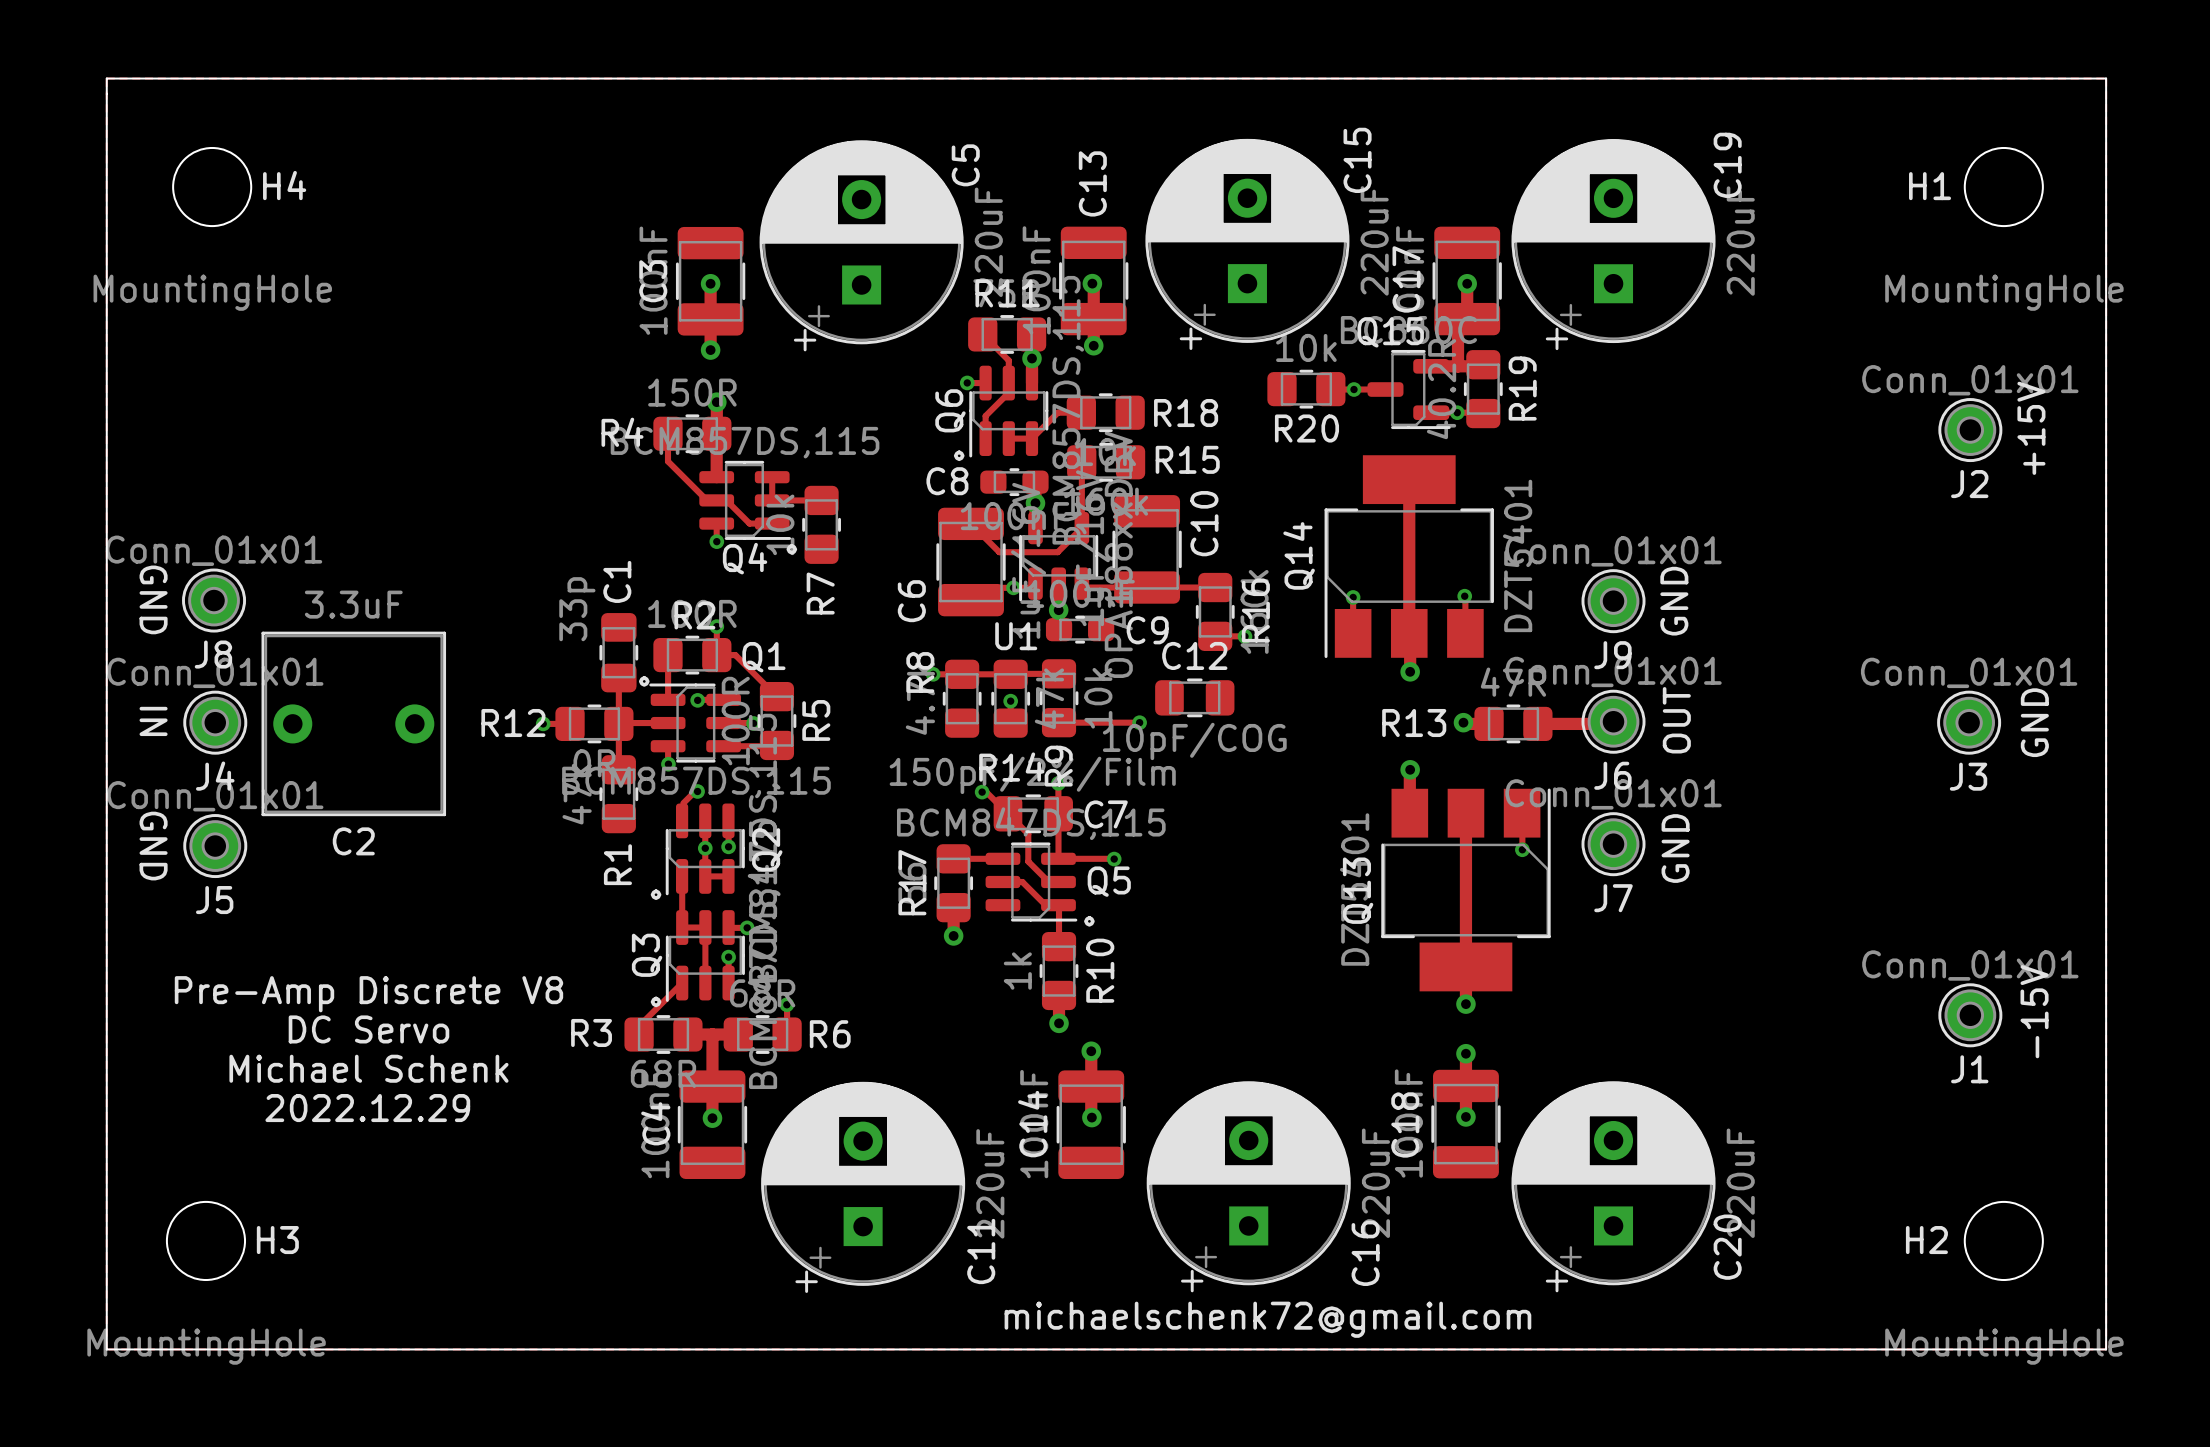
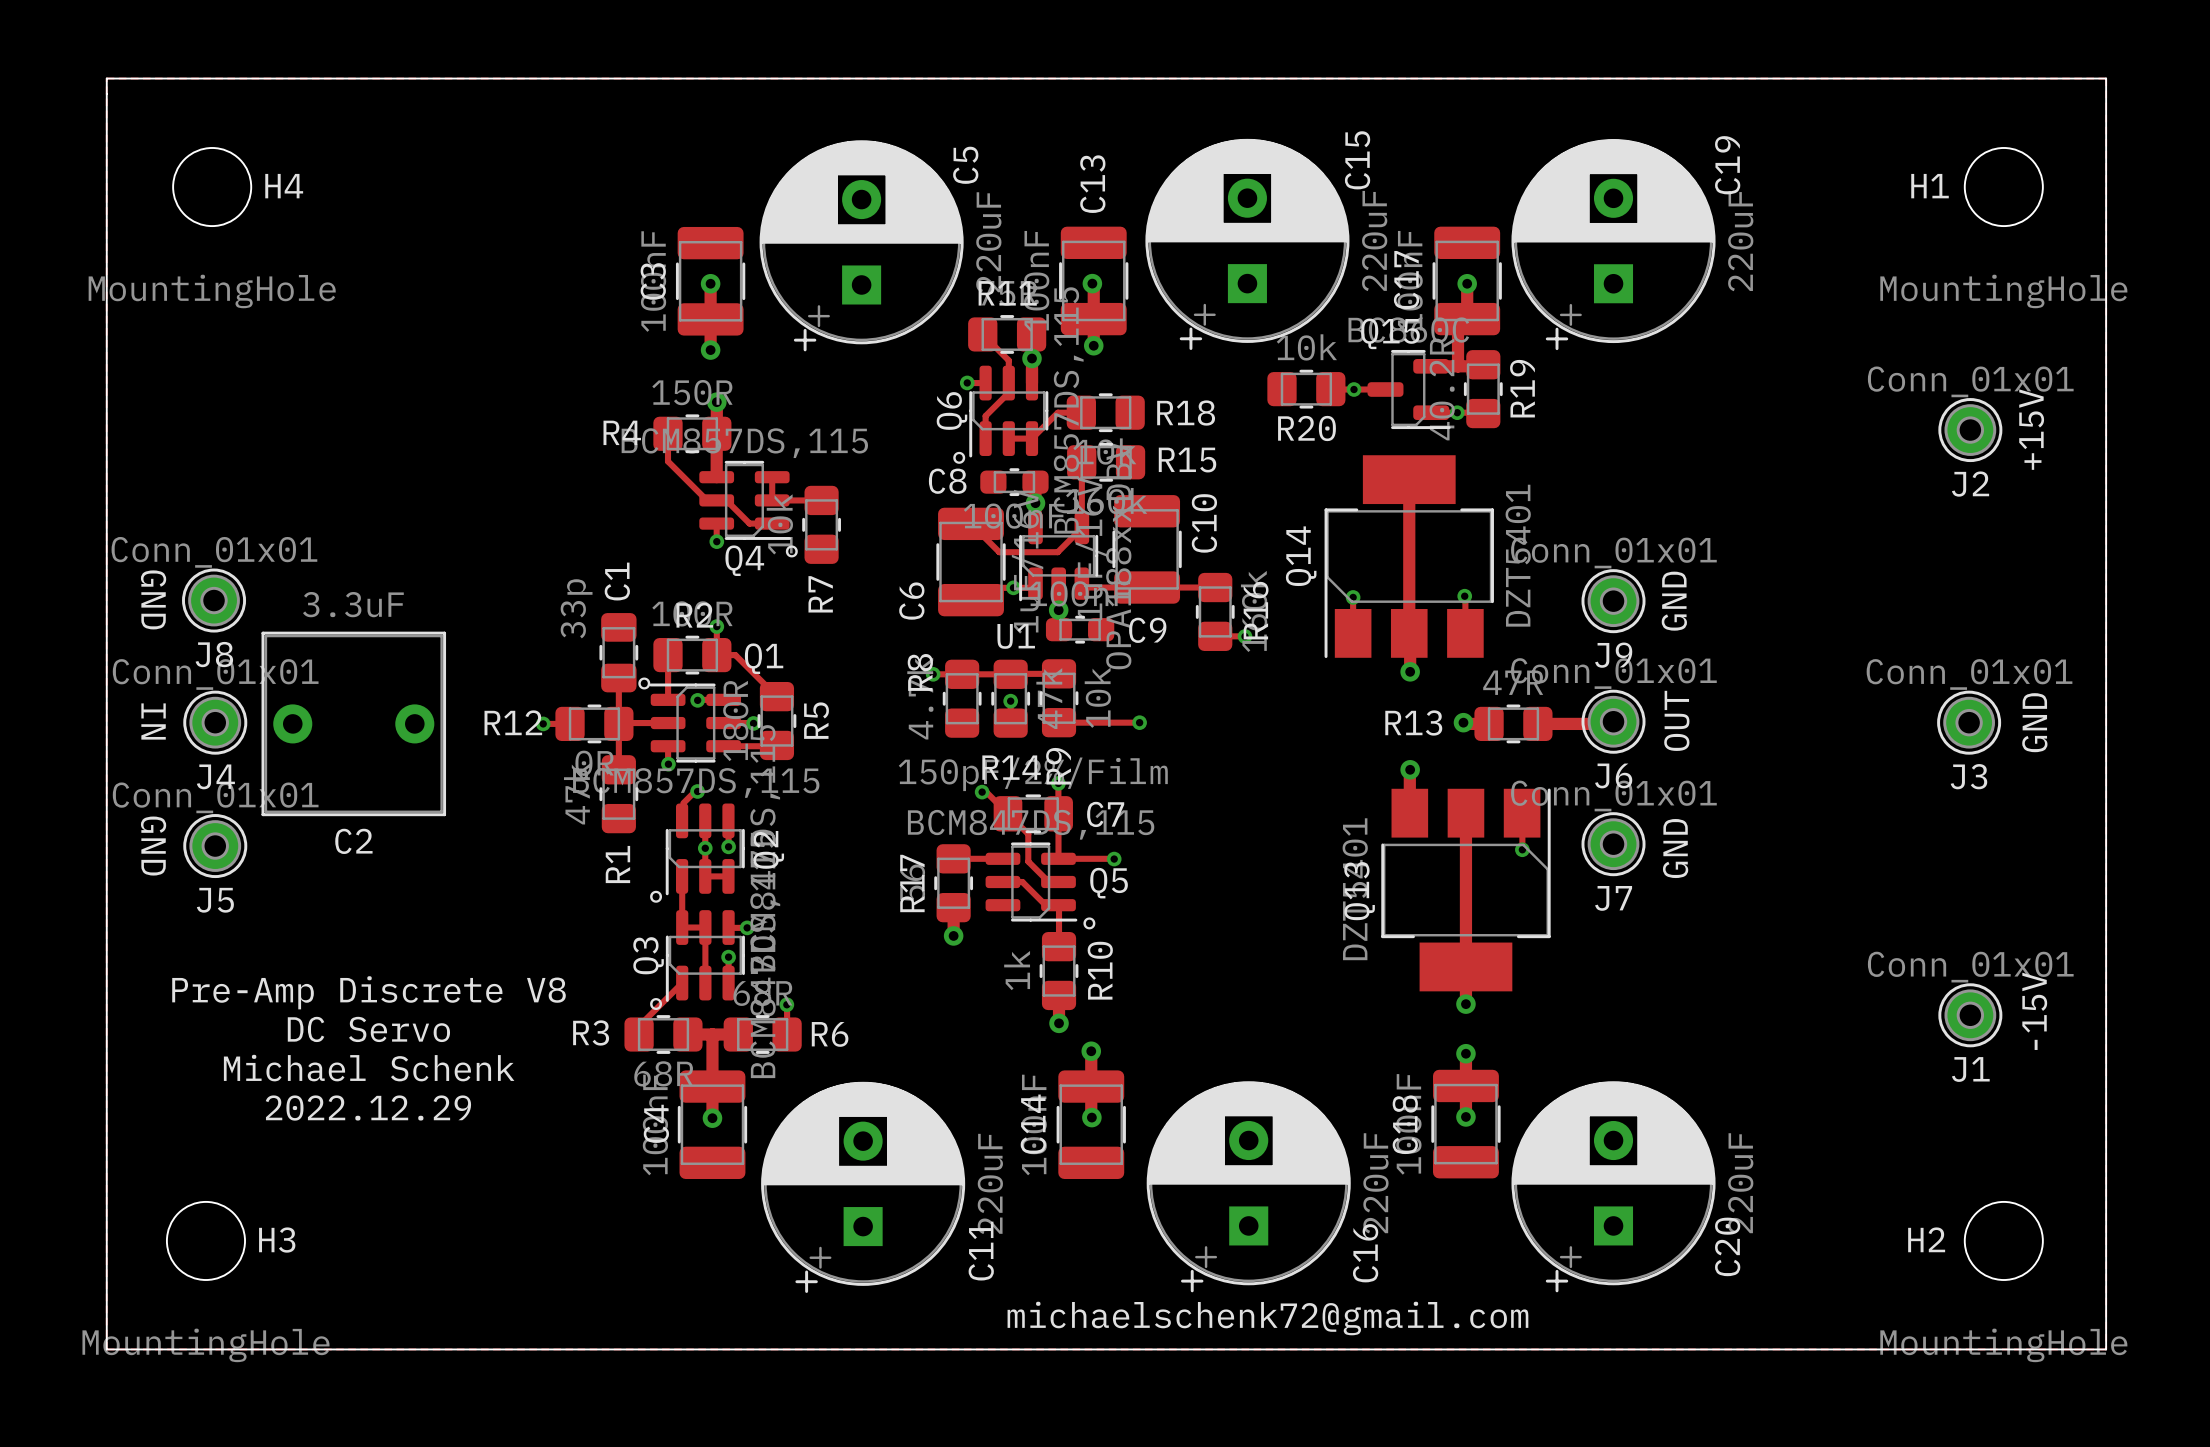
C12: 10pF/COG (1194, 697) -> none
R5 value: 100R (735, 721) -> 180R (735, 721)

